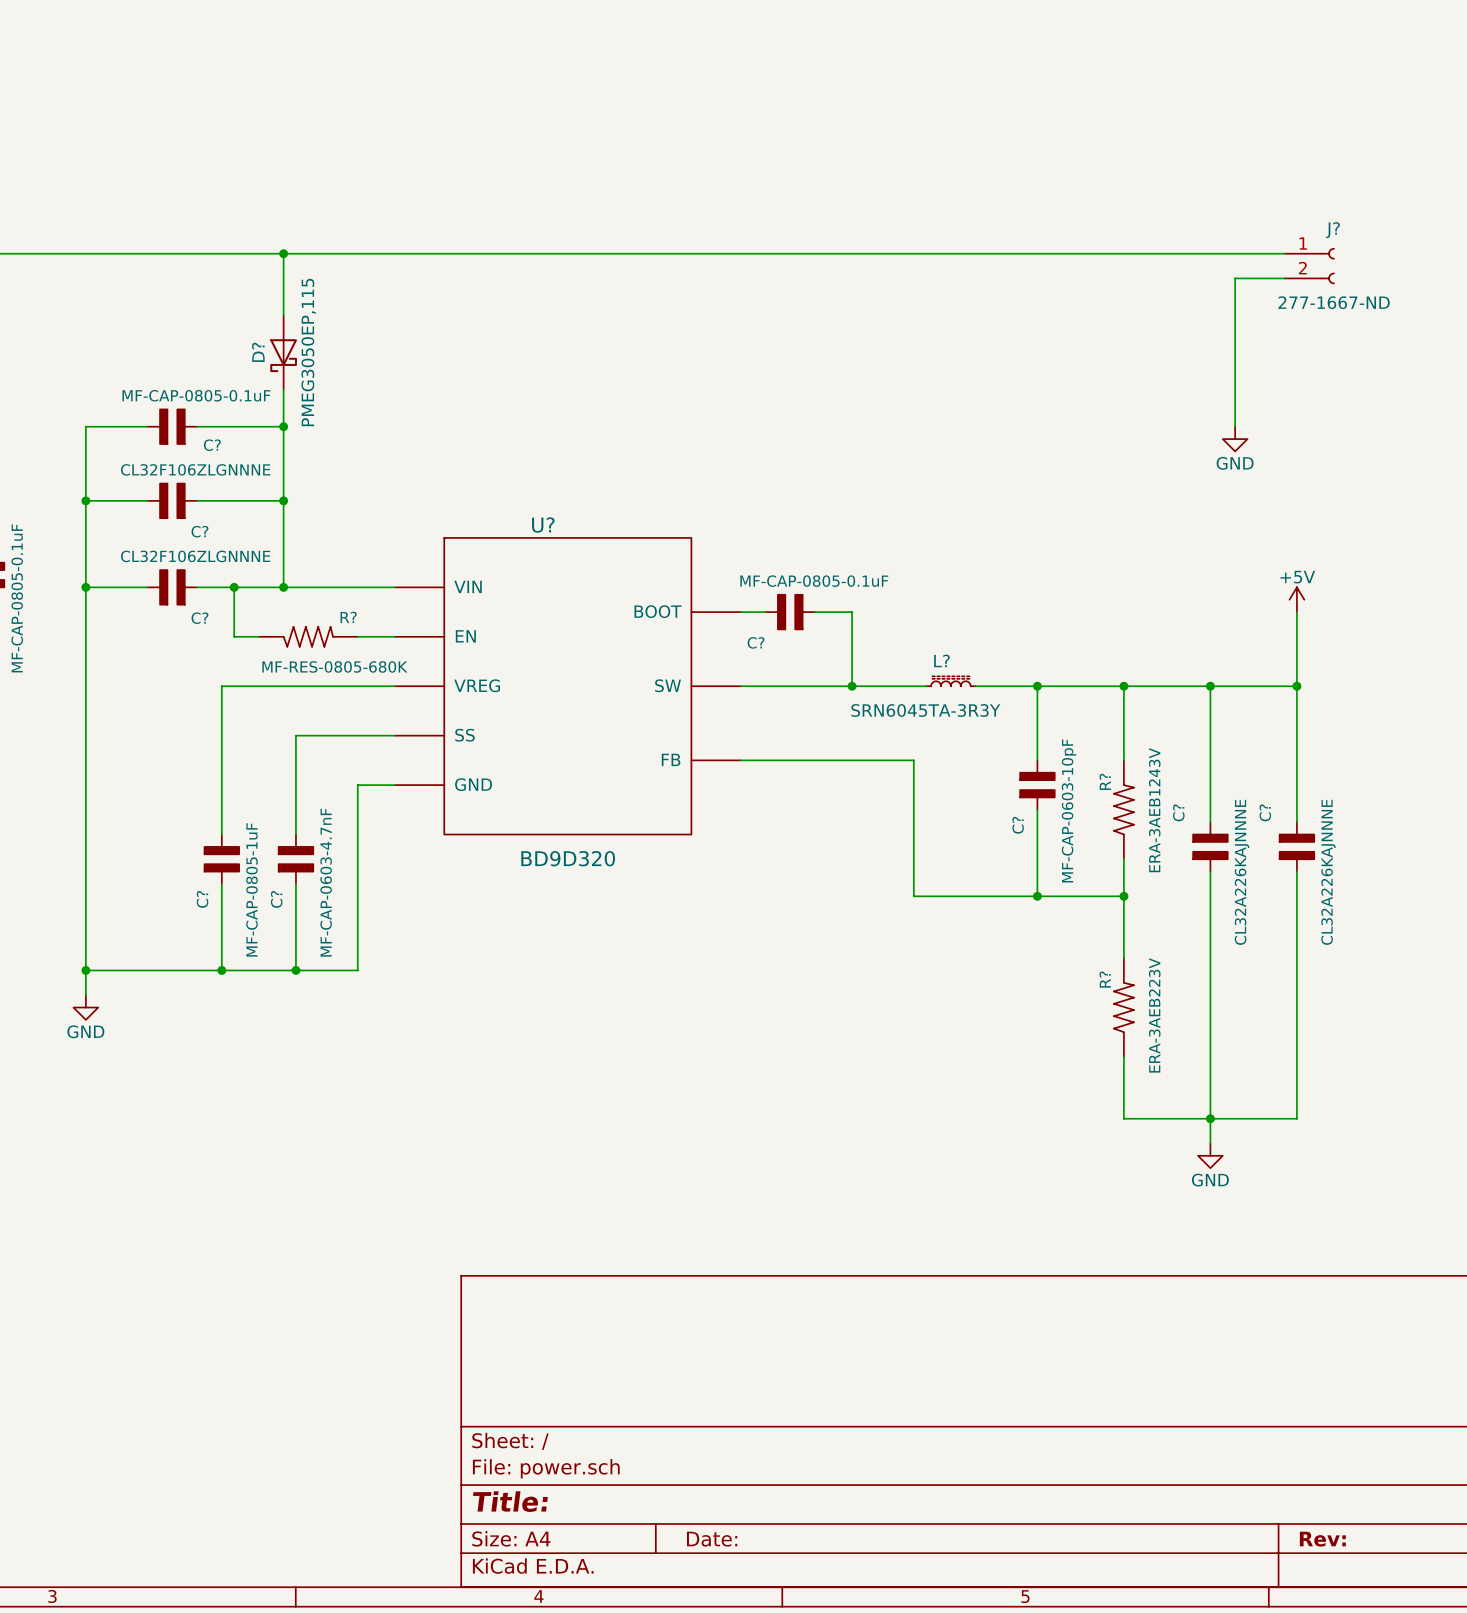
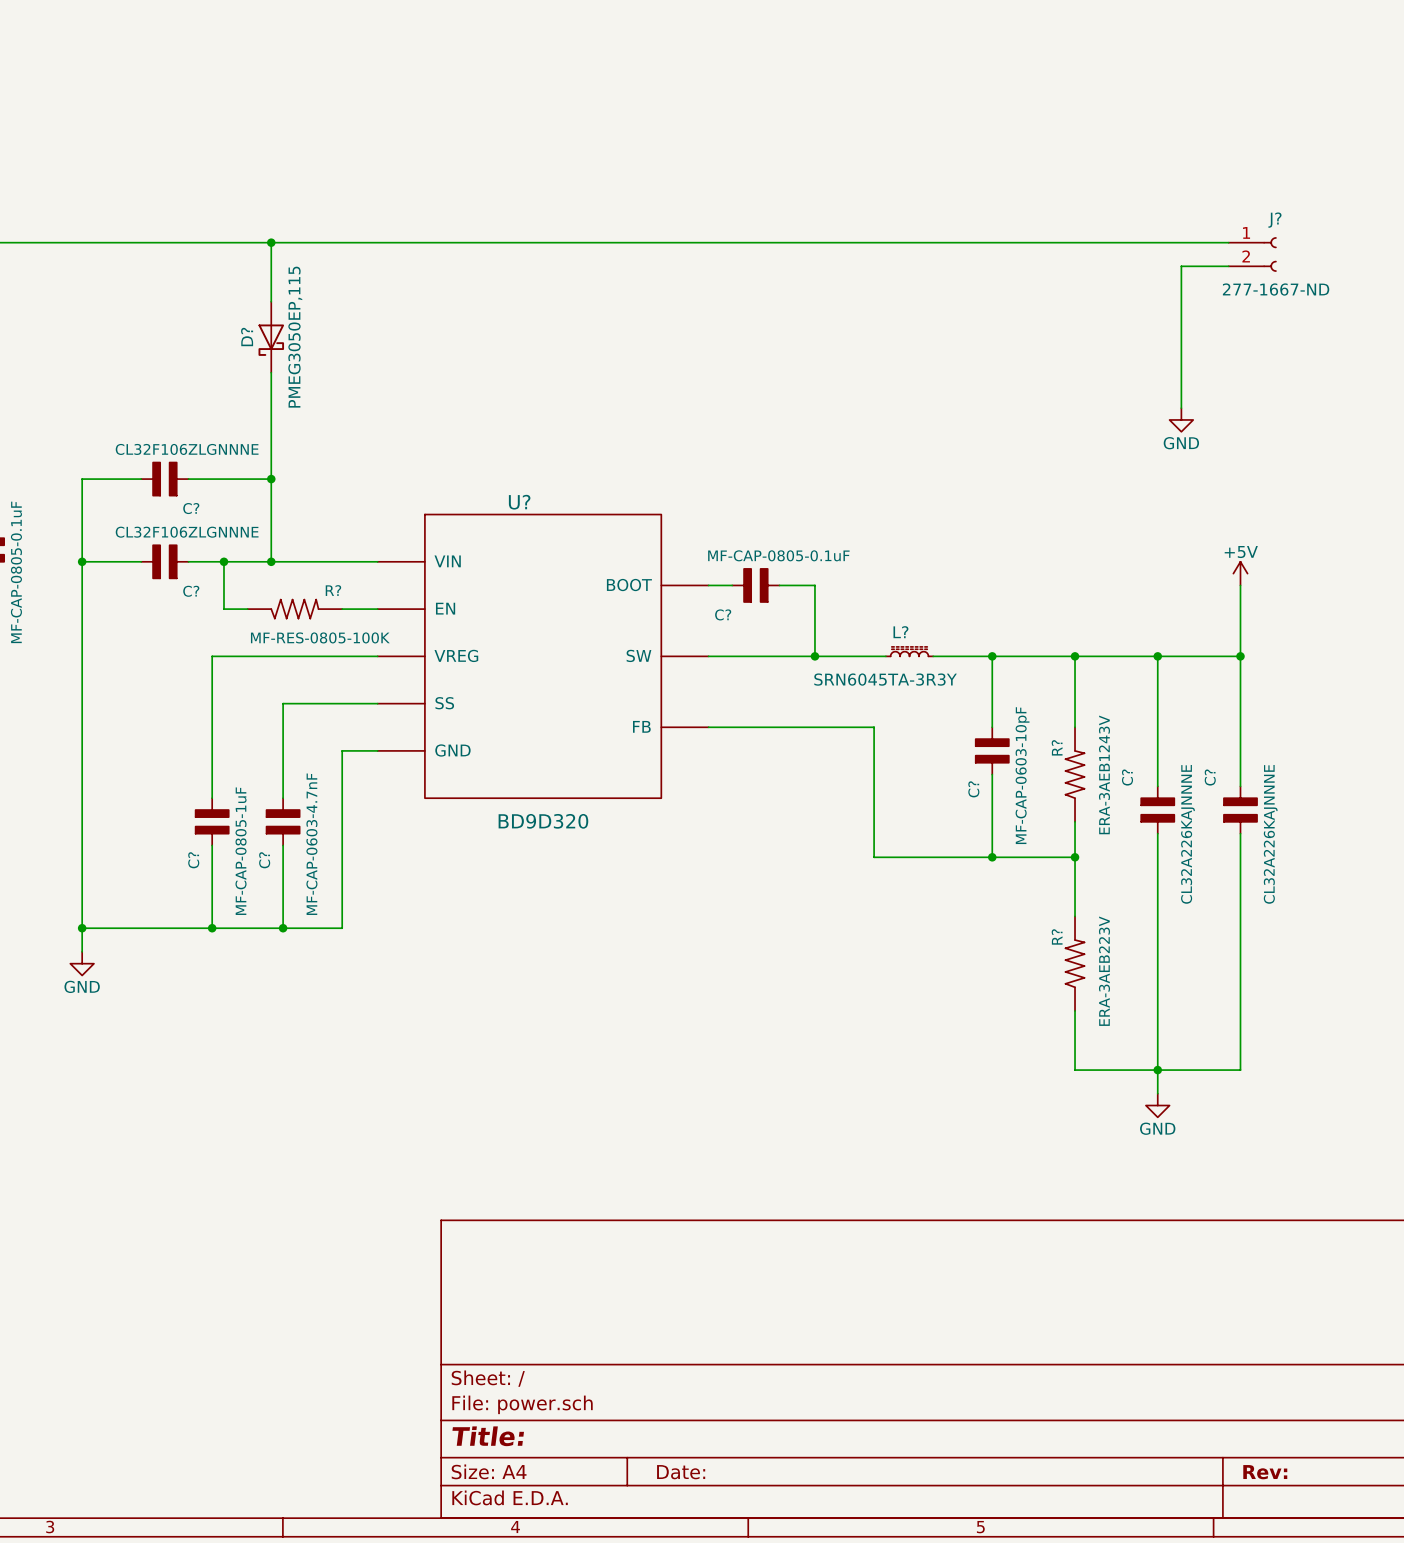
wire: (147, 426) (85, 426) (85, 500) -> none
C?: MF-CAP-0805-0.1uF (172, 426) -> none
wire: (197, 426) (283, 426) -> none
junction: (283, 426) -> none
junction: (85, 500) -> none
R? value: MF-RES-0805-680K (334, 666) -> MF-RES-0805-100K (320, 637)

